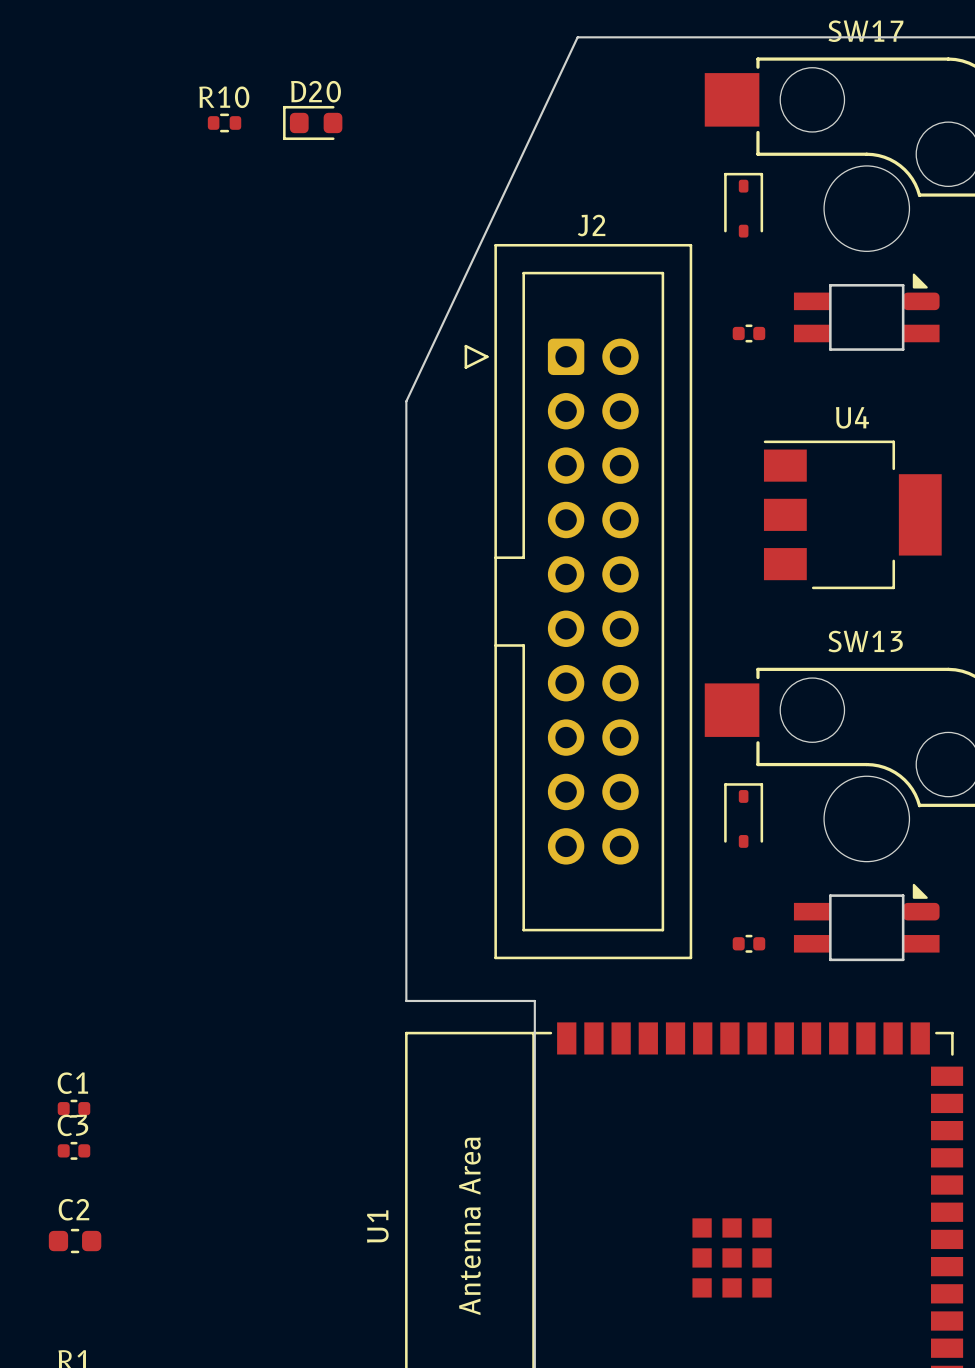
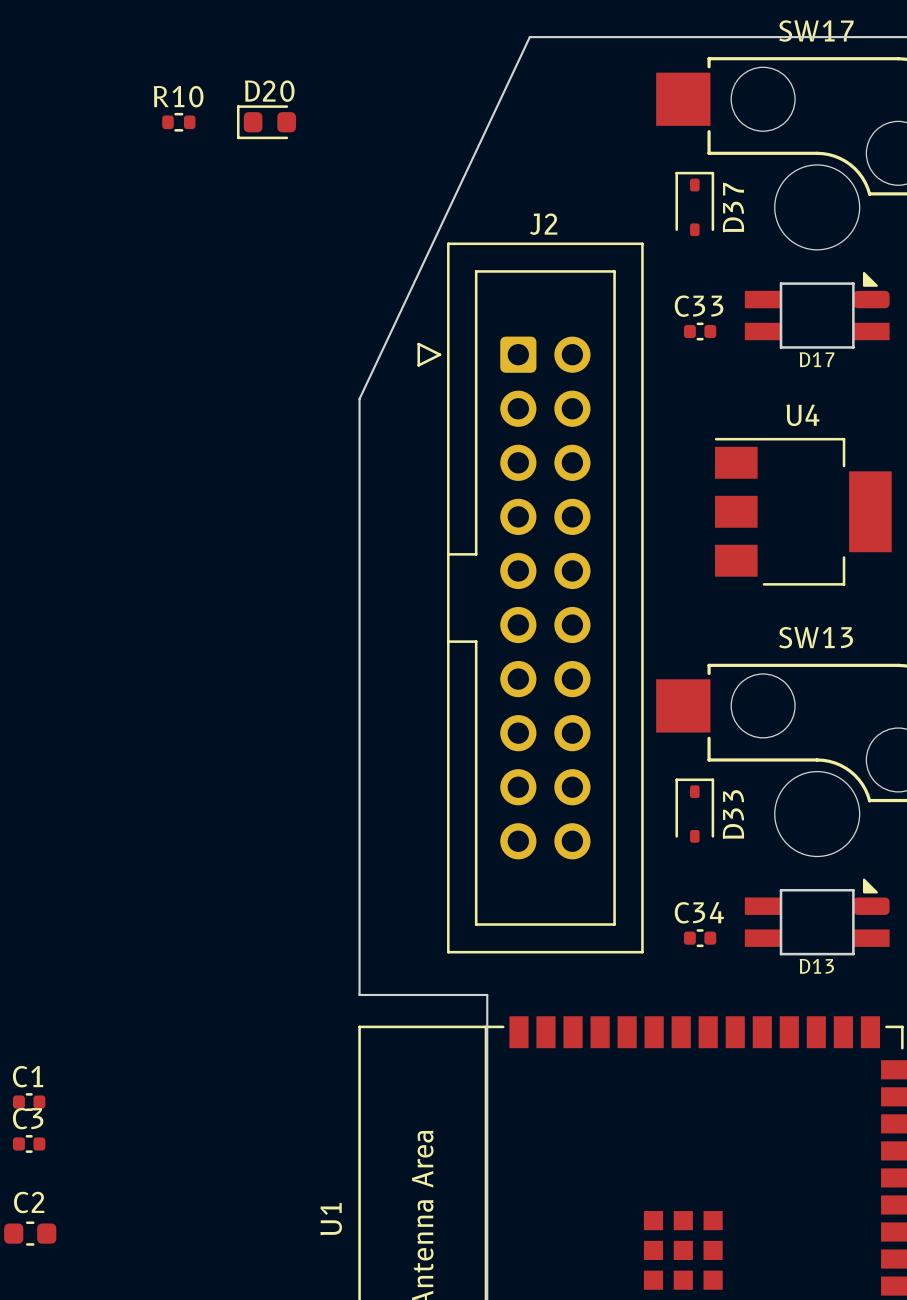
D37 name: none -> D37 (733, 207)
C33 name: none -> C33 (699, 306)
D17 name: none -> D17 (817, 359)
D33 name: none -> D33 (733, 814)
C34 name: none -> C34 (699, 912)
D13 name: none -> D13 (816, 966)

